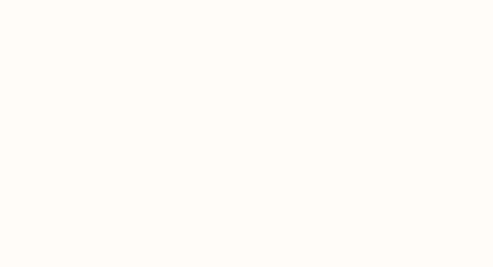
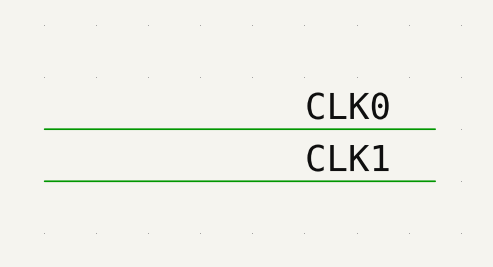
label: none -> CLK0 (348, 105)
wire: none -> (44, 129) (435, 129)
label: none -> CLK1 (347, 158)
wire: none -> (44, 181) (435, 181)

